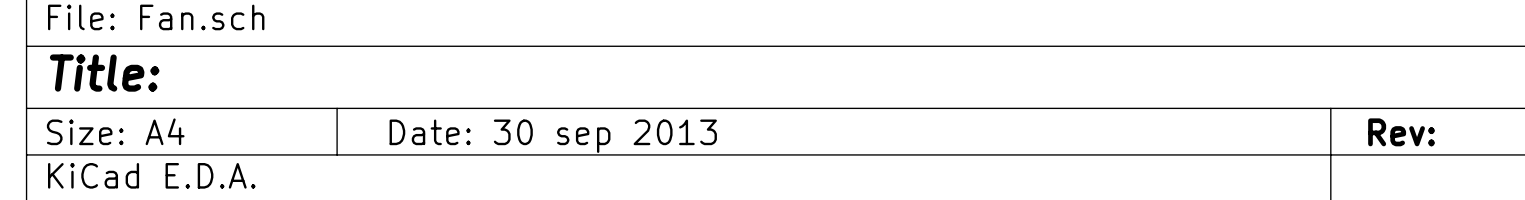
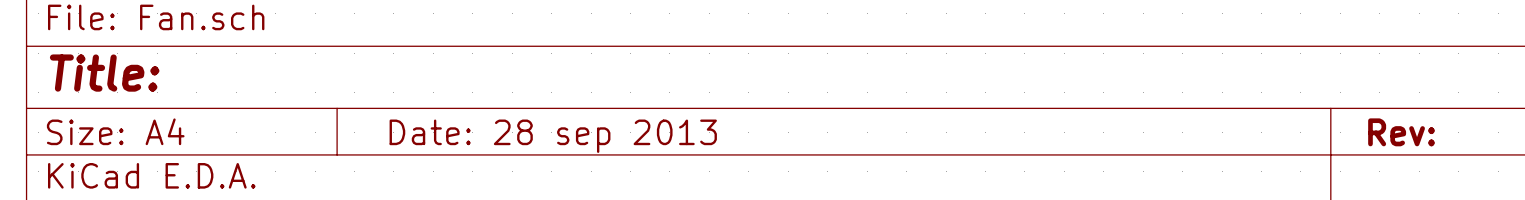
title block: Date: 30 sep 2013 (553, 136) -> Date: 28 sep 2013 (553, 136)

